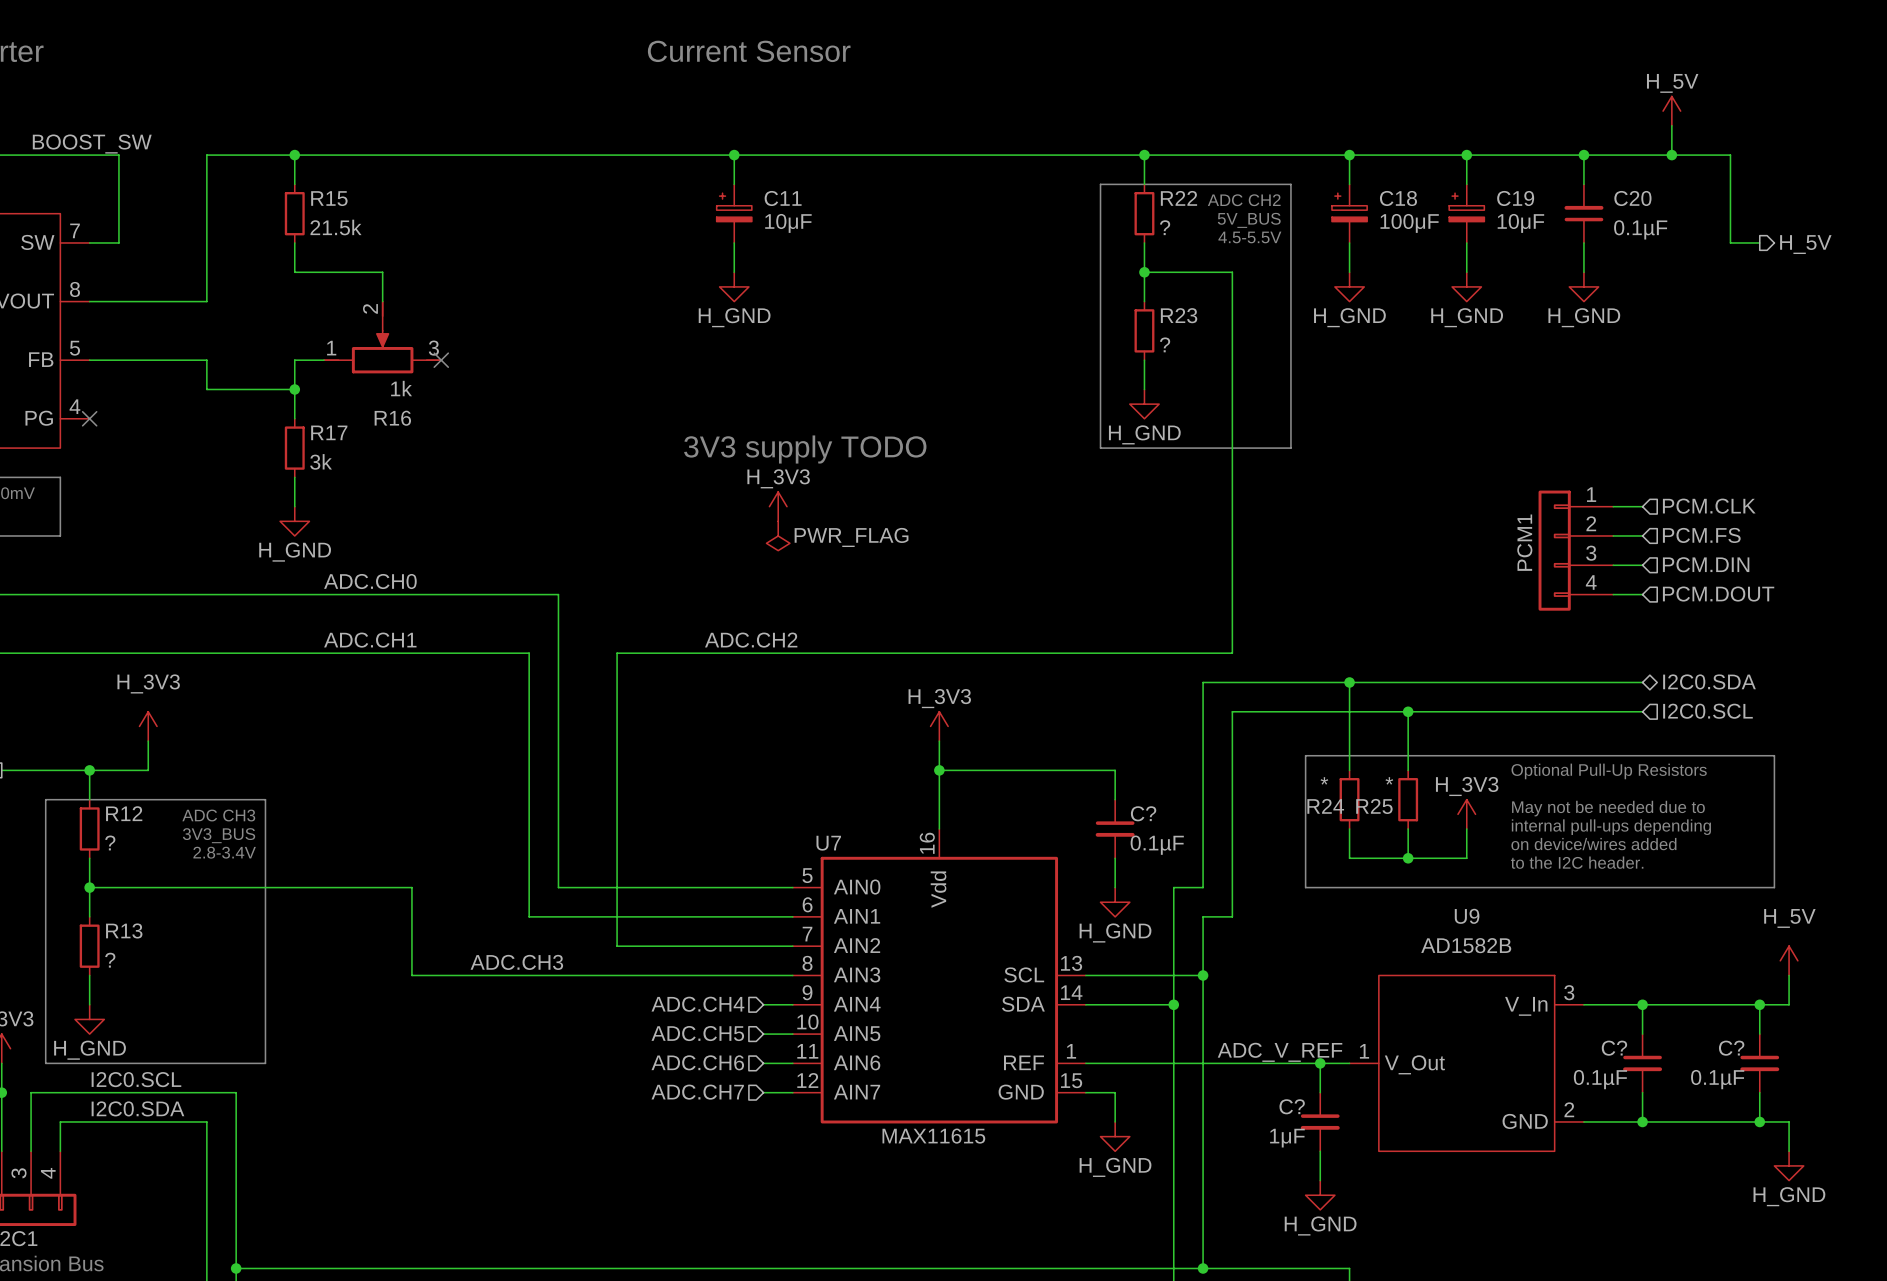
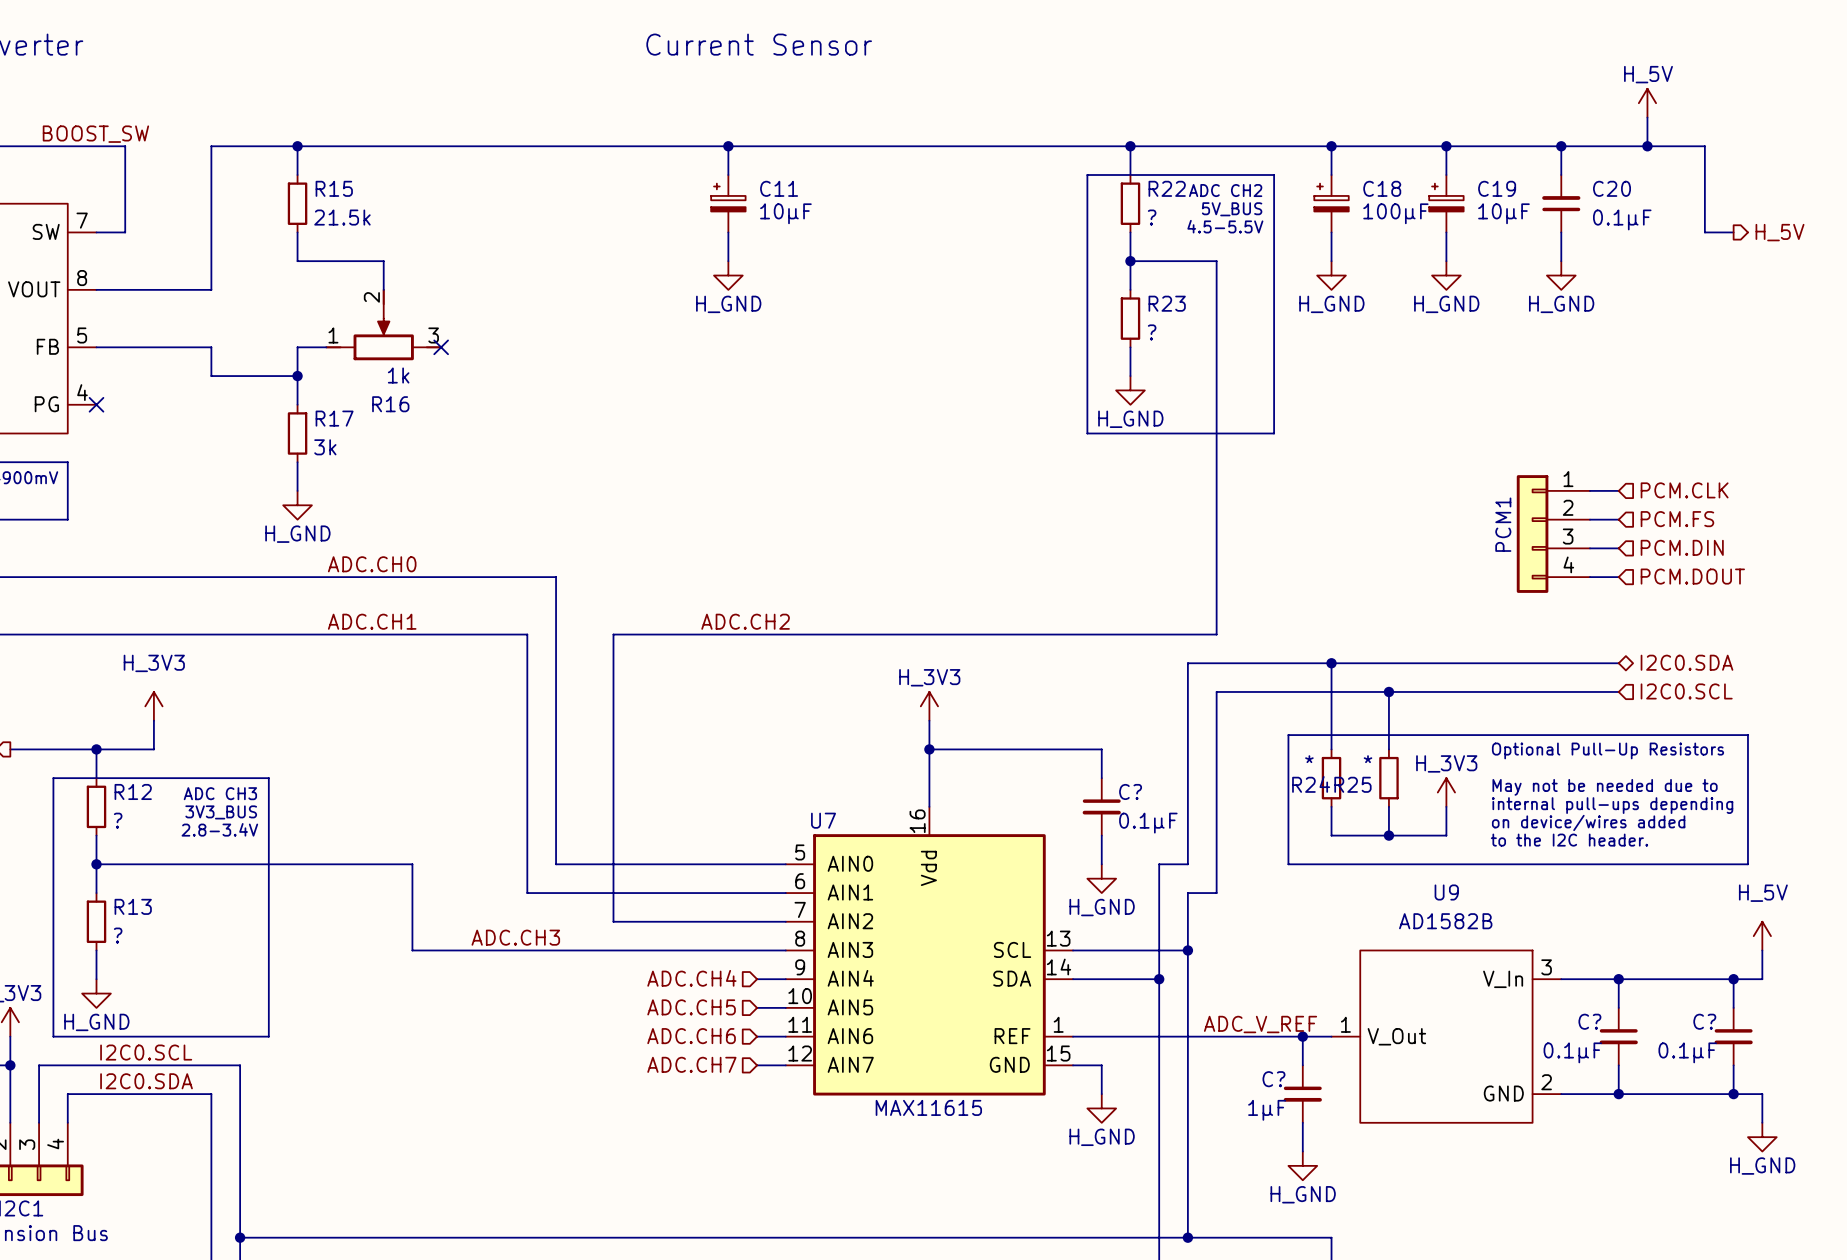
text: 3V3 supply TODO (805, 449) -> none
power symbol: H_3V3 (778, 506) -> none
power symbol: PWR_FLAG (778, 535) -> none

